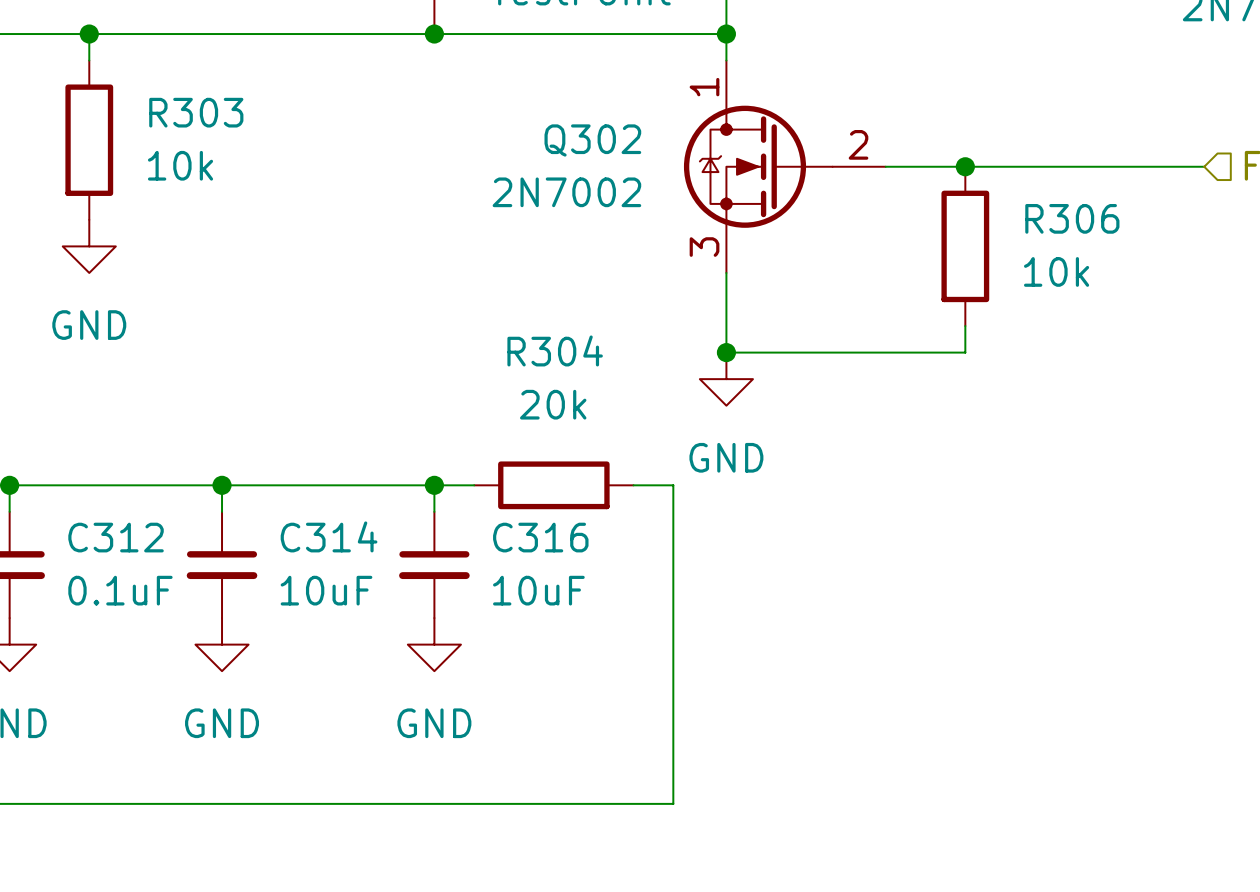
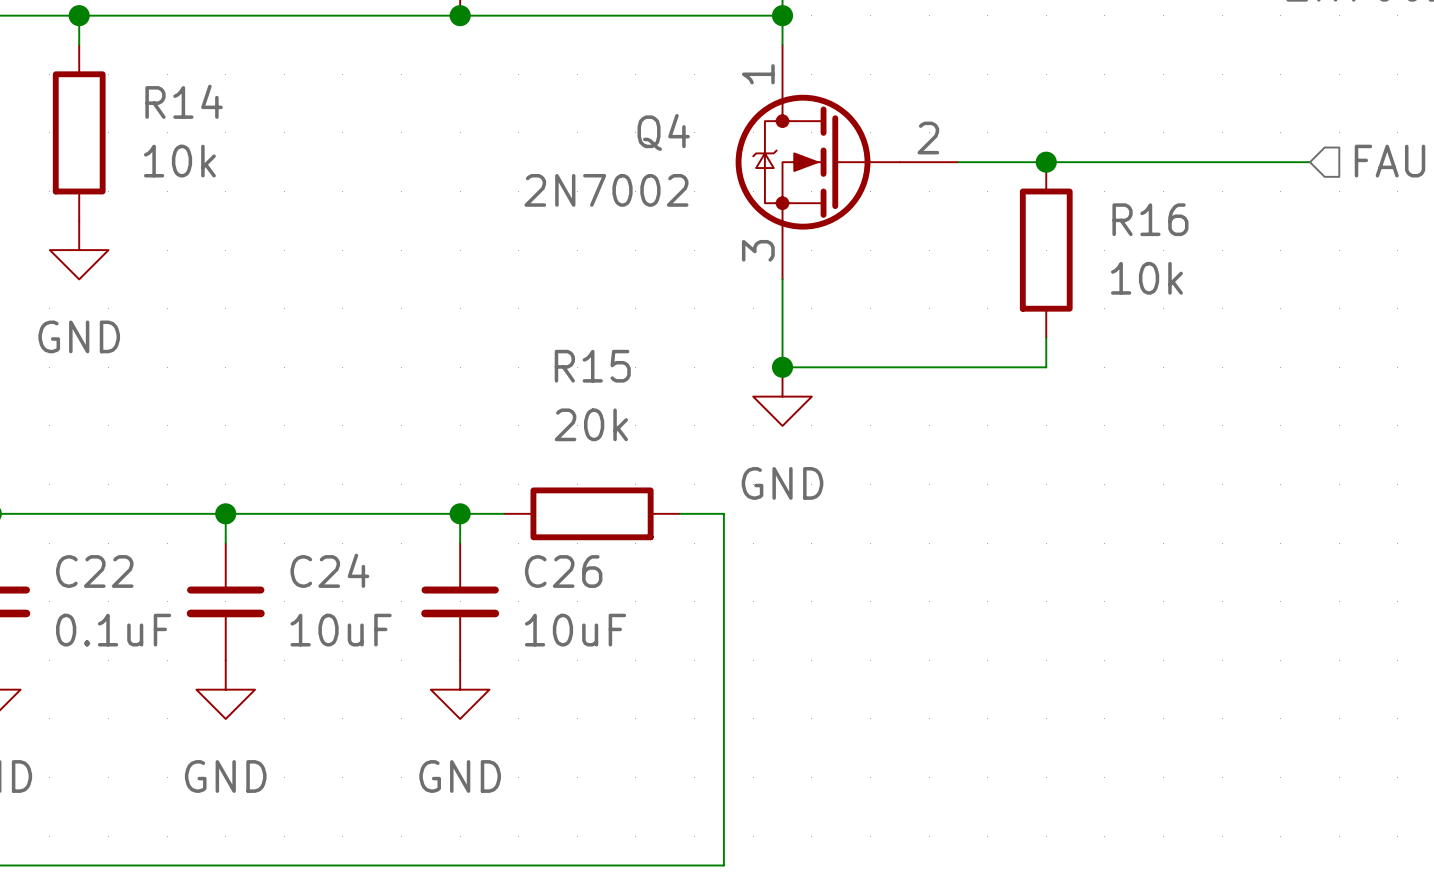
R303 name: R303 (196, 112) -> R14 (184, 101)
Q302 name: Q302 (592, 140) -> Q4 (663, 132)
R306 name: R306 (1072, 218) -> R16 (1150, 219)
R304 name: R304 (555, 350) -> R15 (592, 366)
C314 name: C314 (329, 536) -> C24 (329, 570)
C312 name: C312 (116, 537) -> C22 (94, 571)
C316 name: C316 (540, 537) -> C26 (563, 571)

